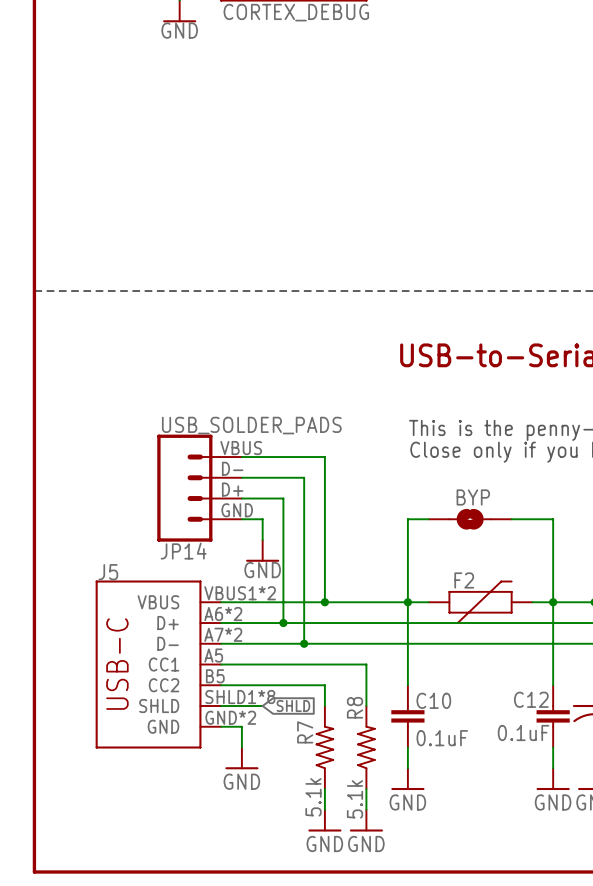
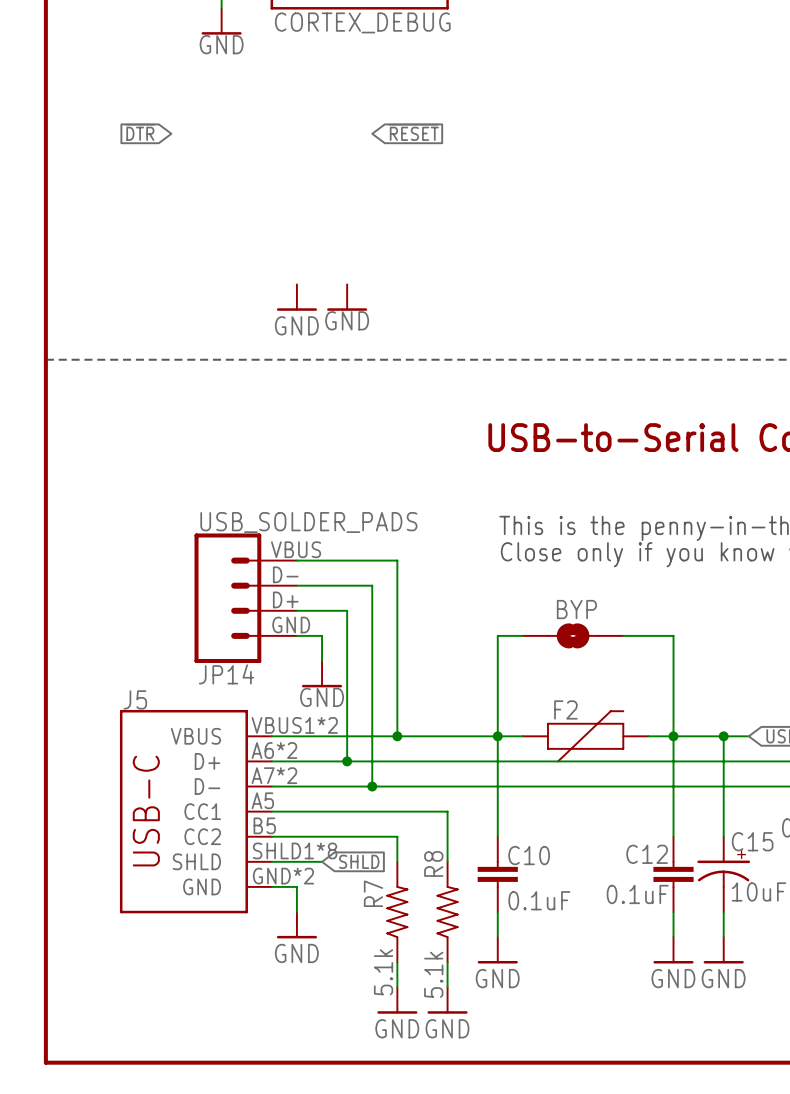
global label: none -> ~{DTR} (140, 132)
global label: none -> ~{RESET} (413, 132)
power symbol: none -> GND (296, 297)
power symbol: none -> GND (347, 297)

